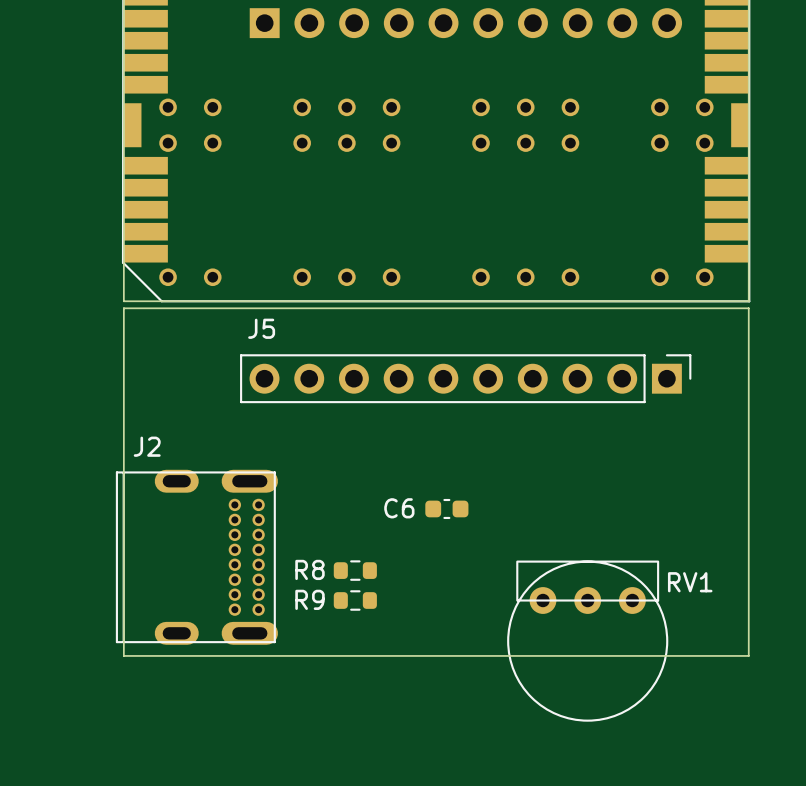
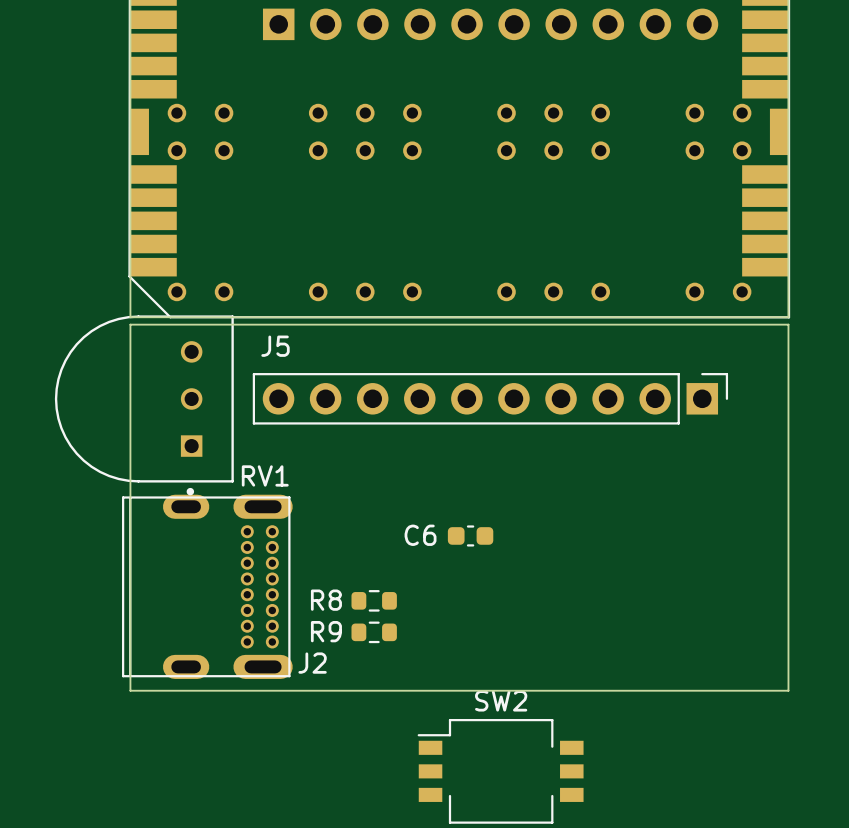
J2 name position: J2 (147, 446) -> J2 (312, 663)
RV1 footprint: [507, 560, 669, 722] -> [54, 315, 234, 496]
RV1 name position: RV1 (690, 582) -> RV1 (265, 475)
SW2: none -> (500, 771)

